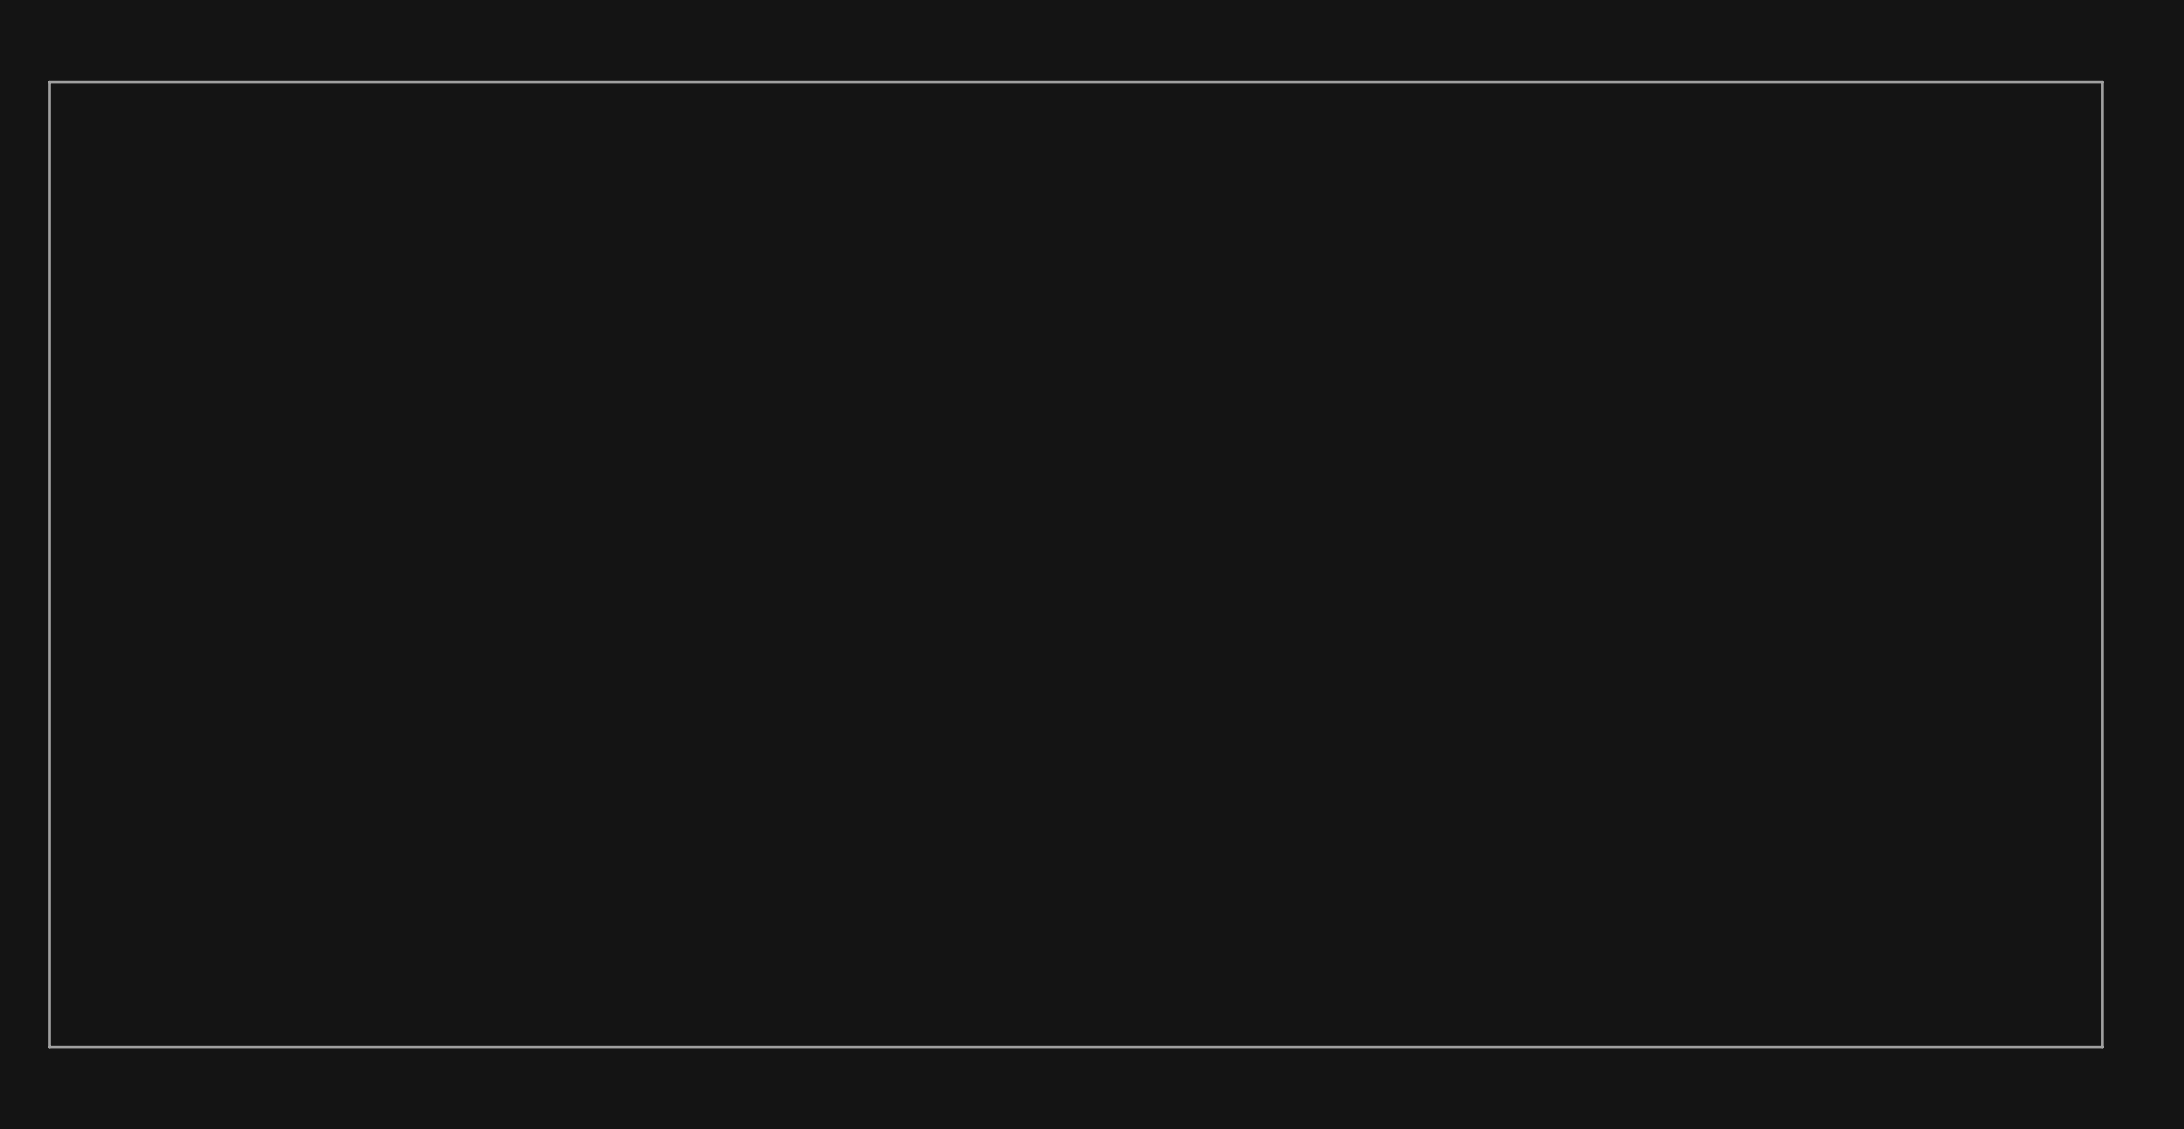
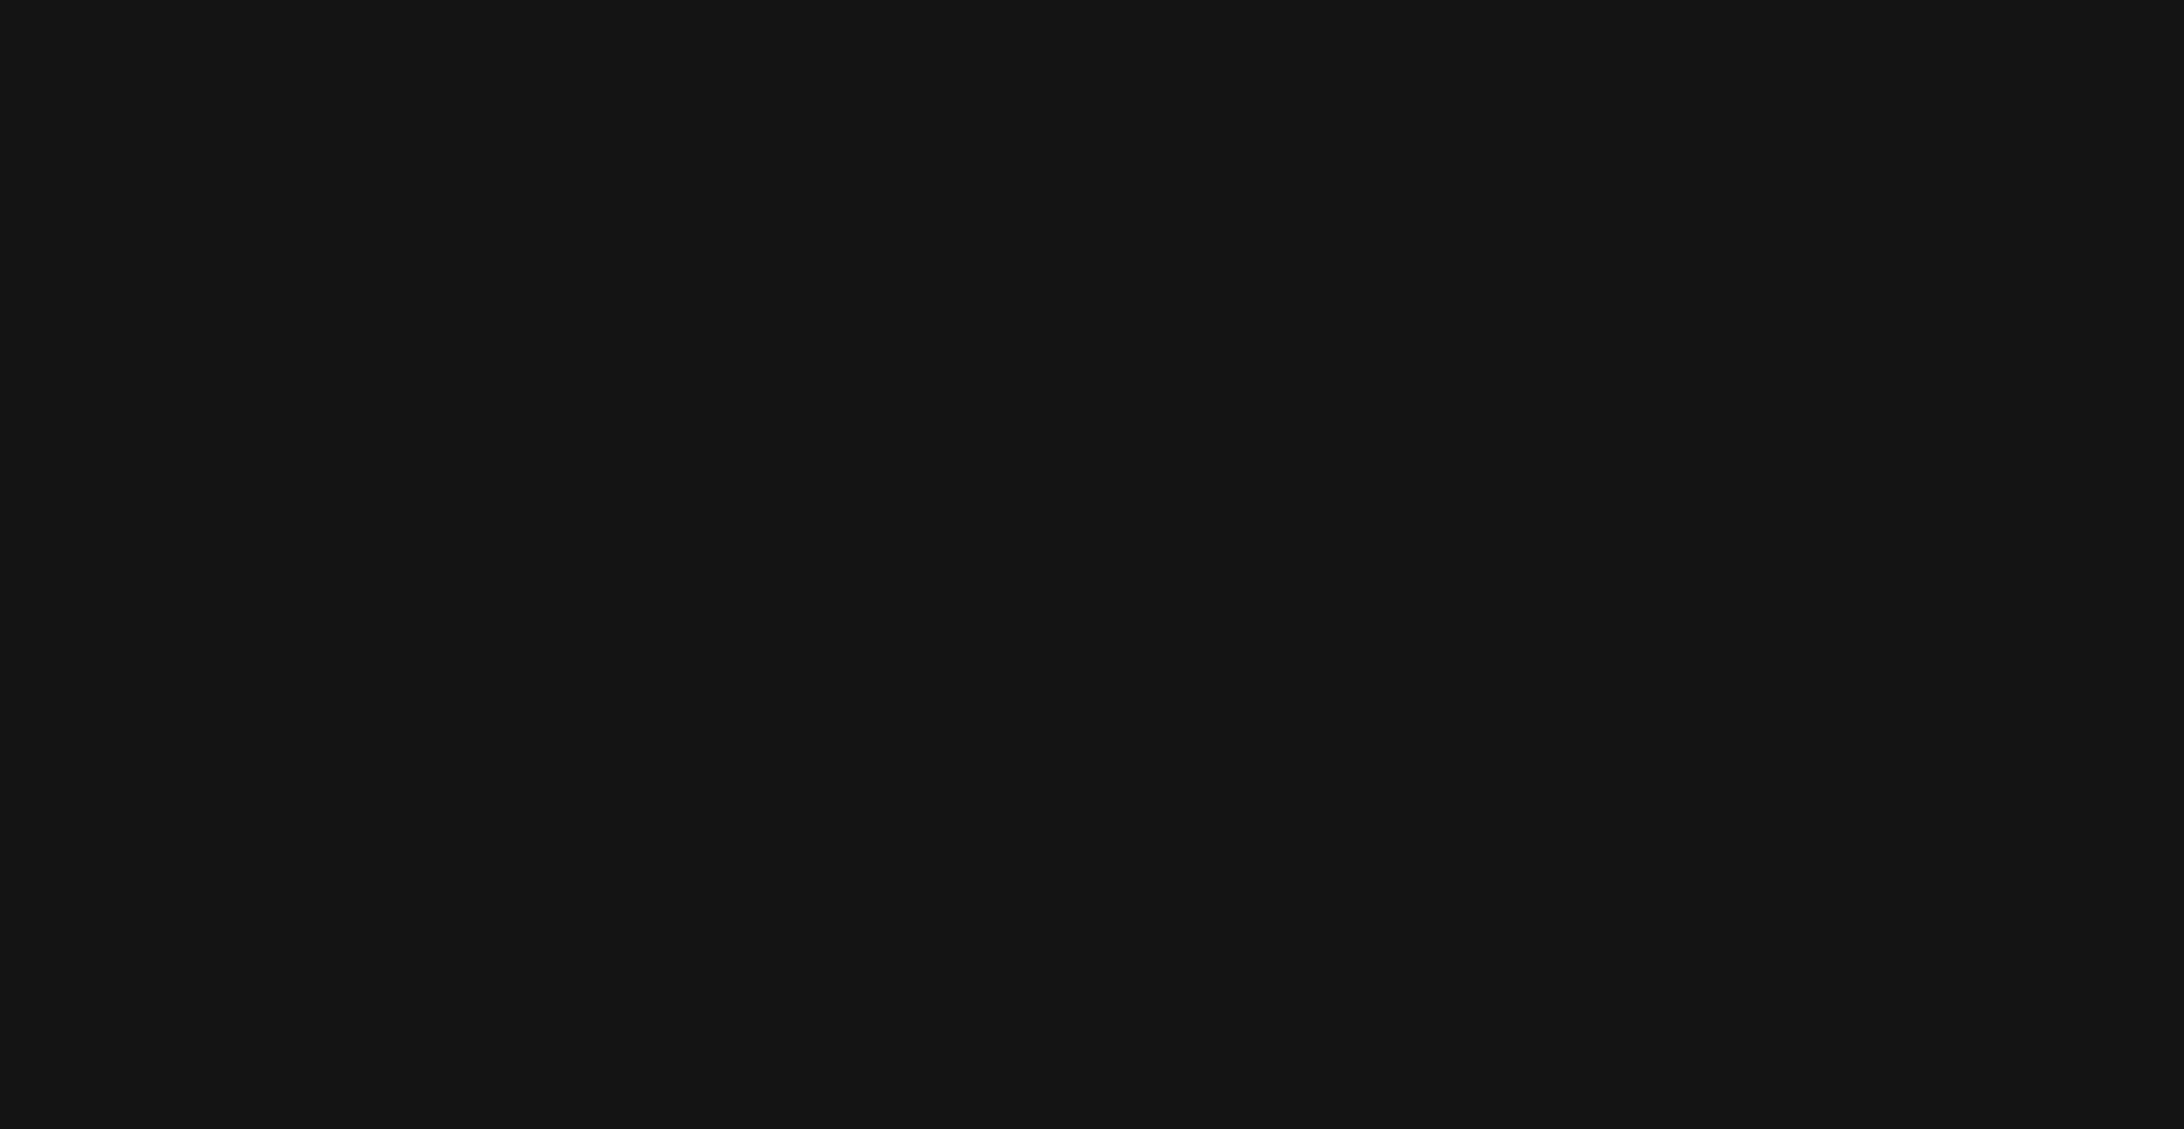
board edge: (49, 82) (2102, 82) (2102, 1047) (49, 1047) (49, 82) -> none

